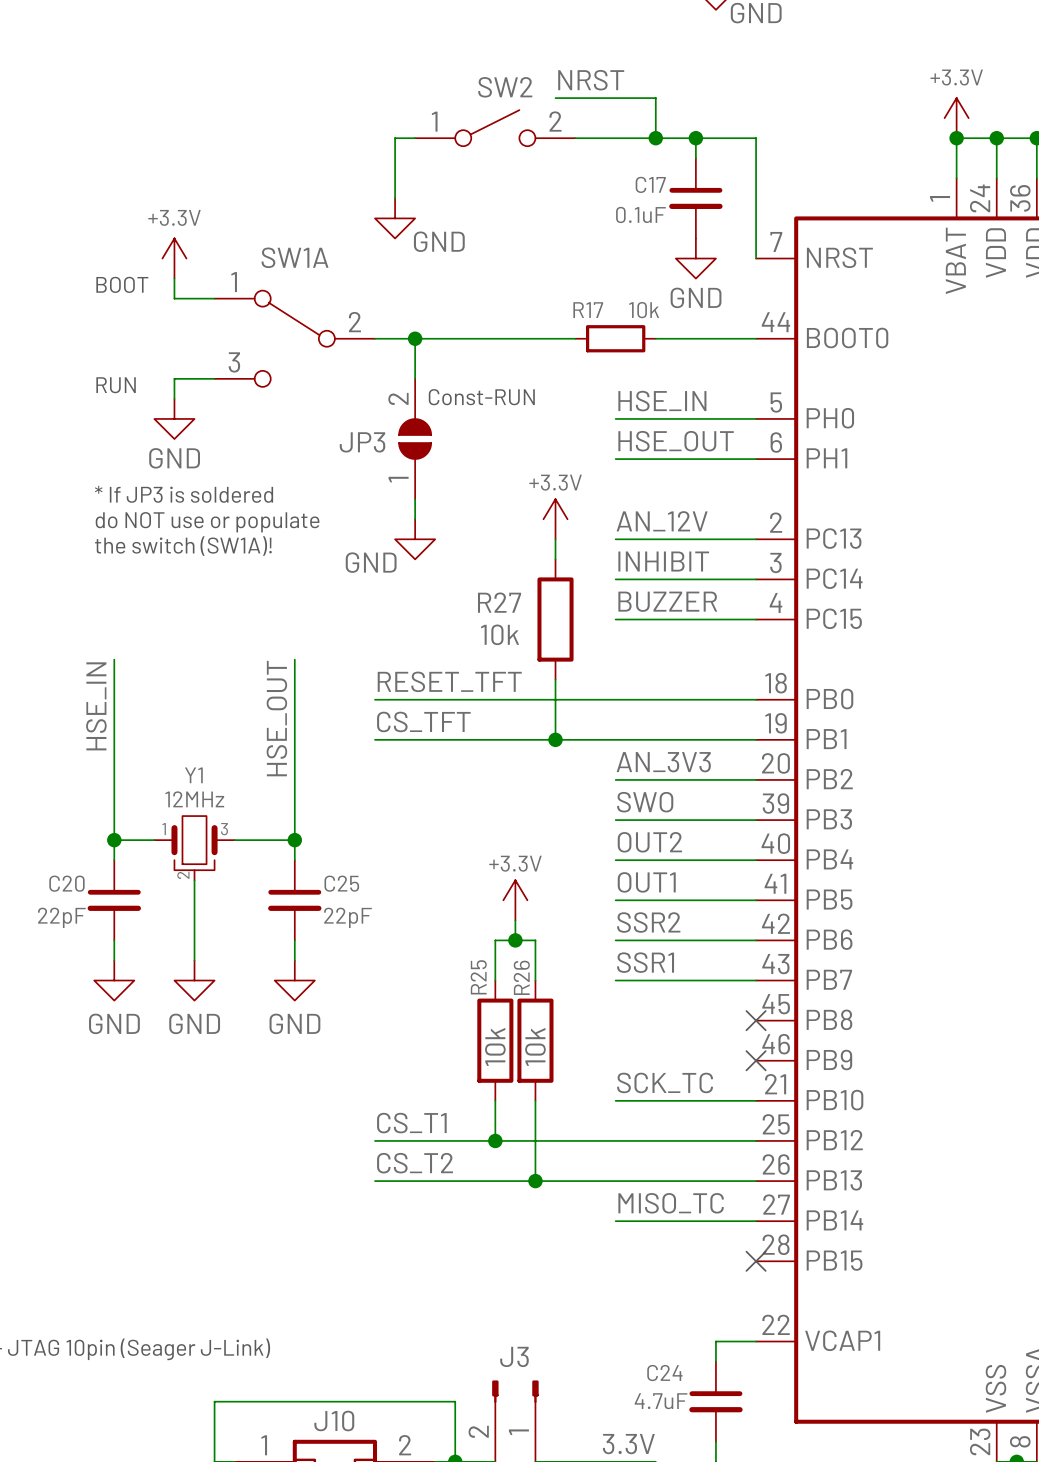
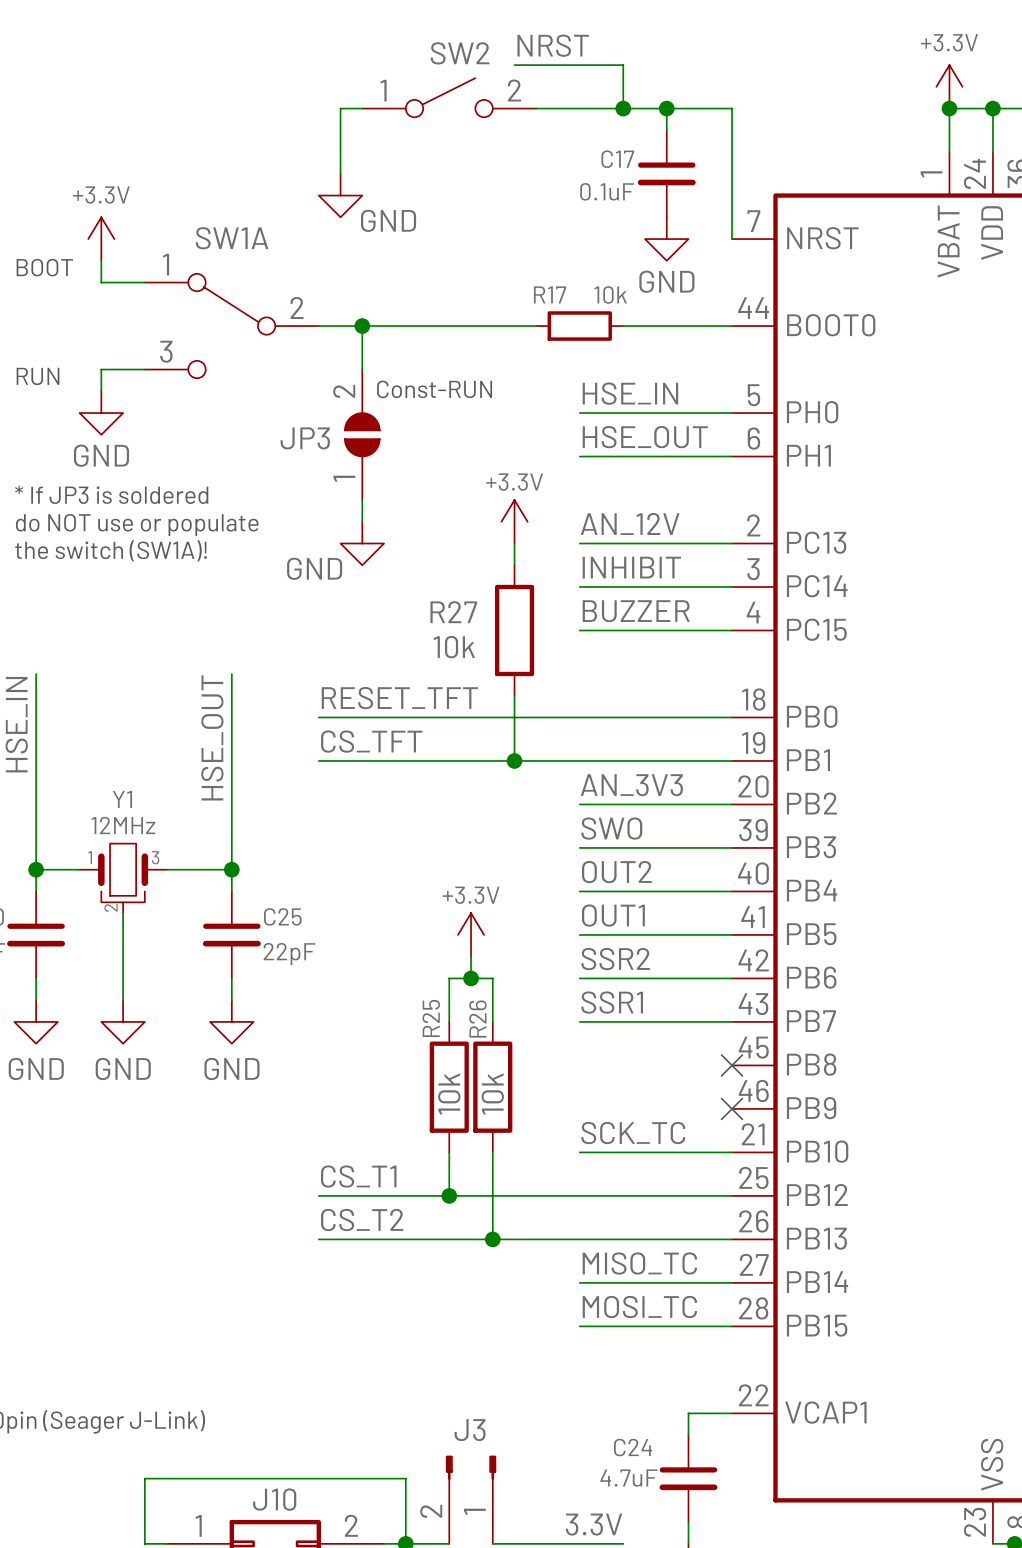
label: none -> MOSI_TC (639, 1307)
wire: none -> (579, 1326) (731, 1326)
no-connect mark: (756, 1261) -> none

